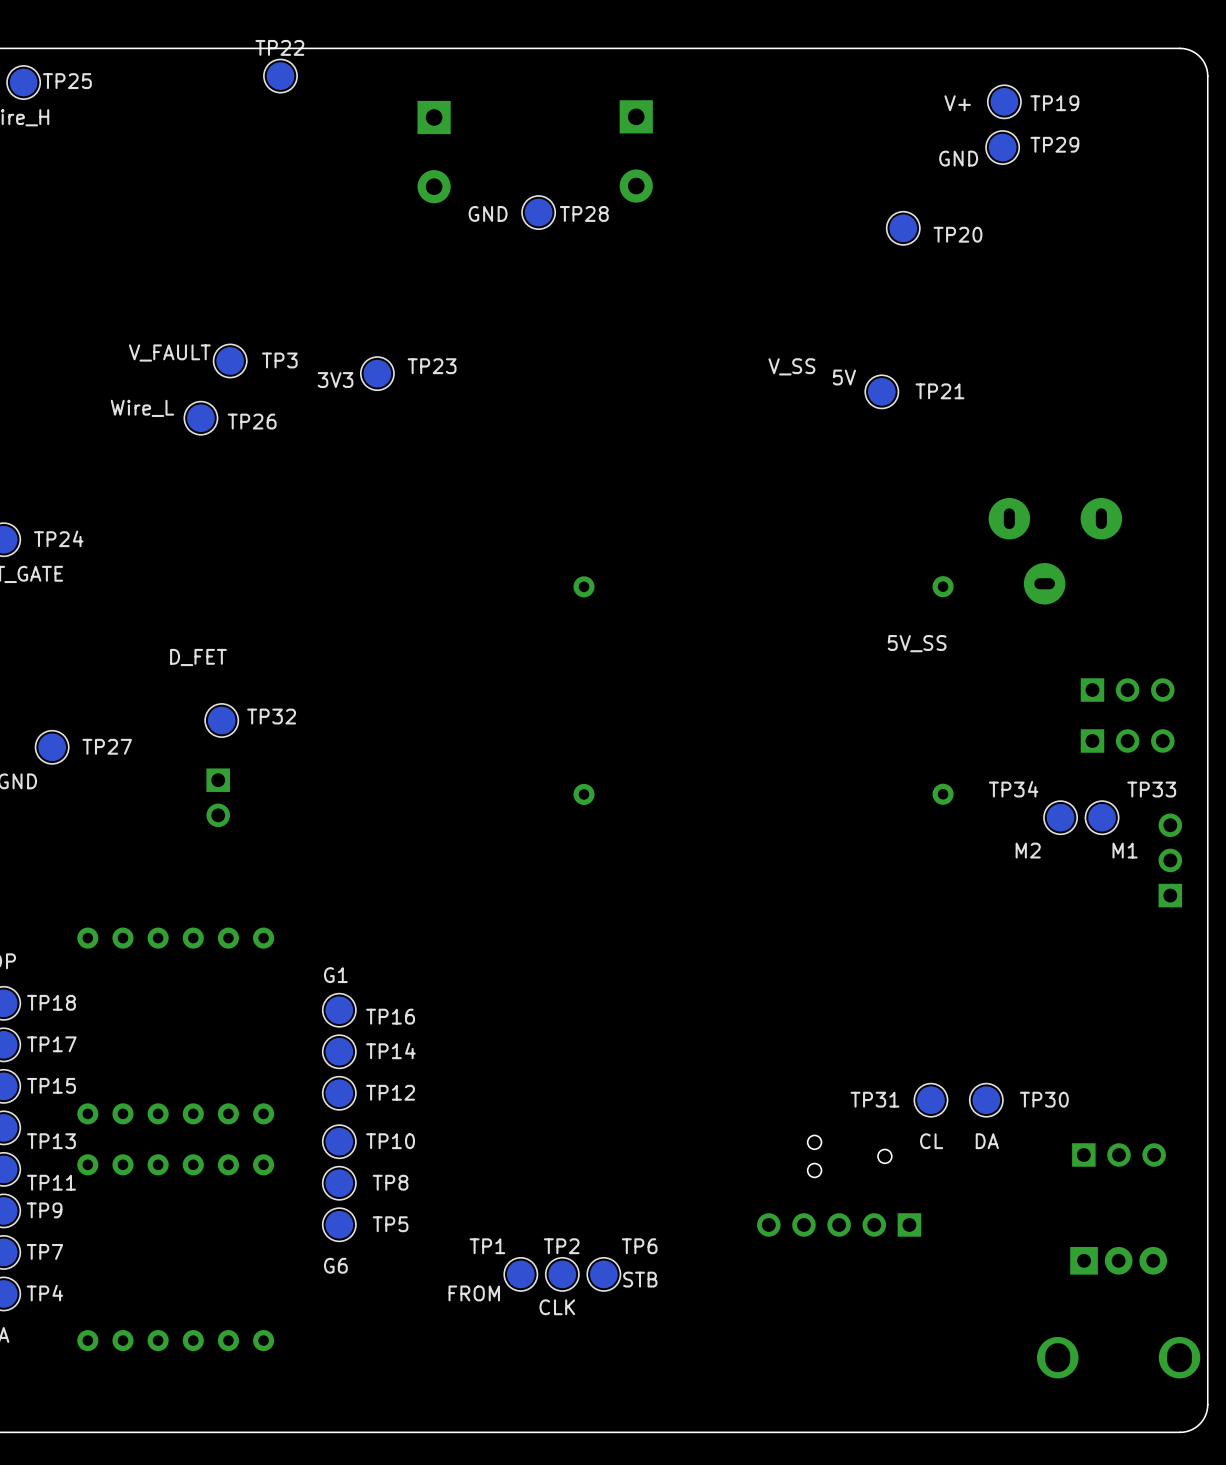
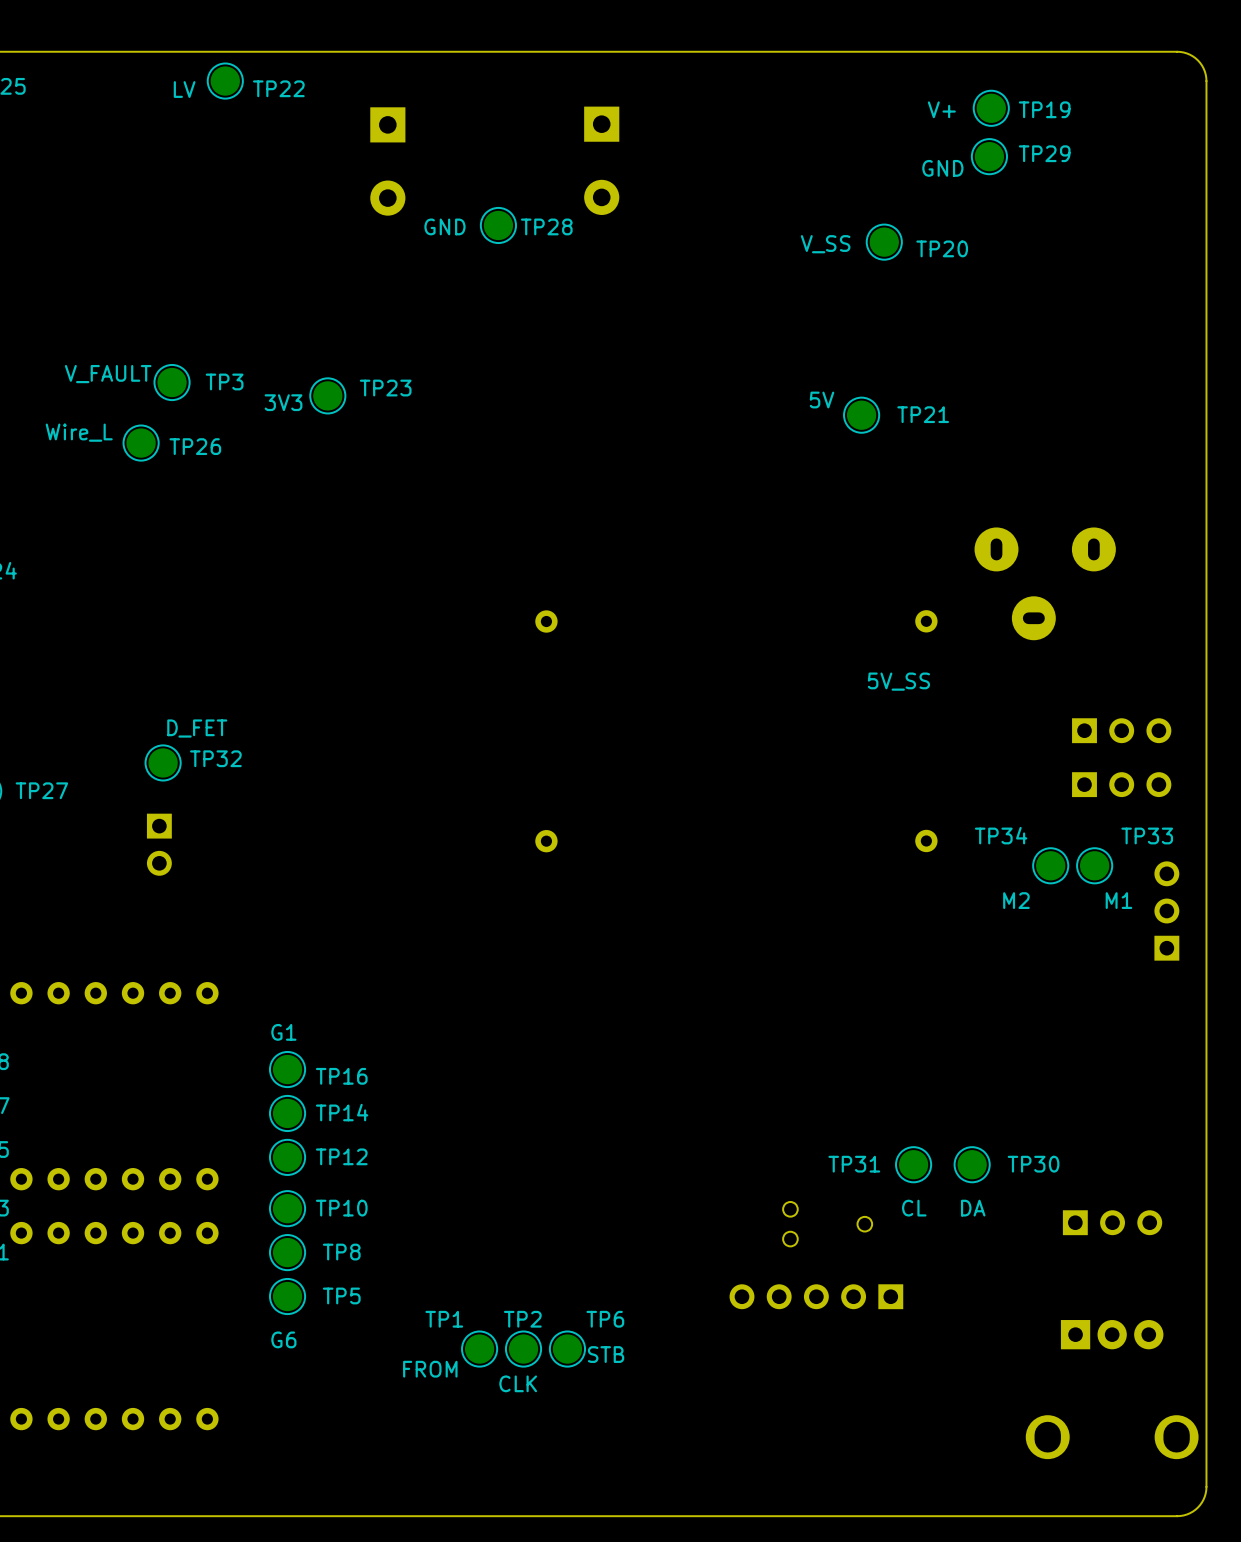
TP22 name position: TP22 (279, 47) -> TP22 (278, 88)
text: none -> LV (184, 89)
text position: V_SS (791, 366) -> V_SS (825, 244)
text position: D_FET (198, 657) -> D_FET (197, 728)

